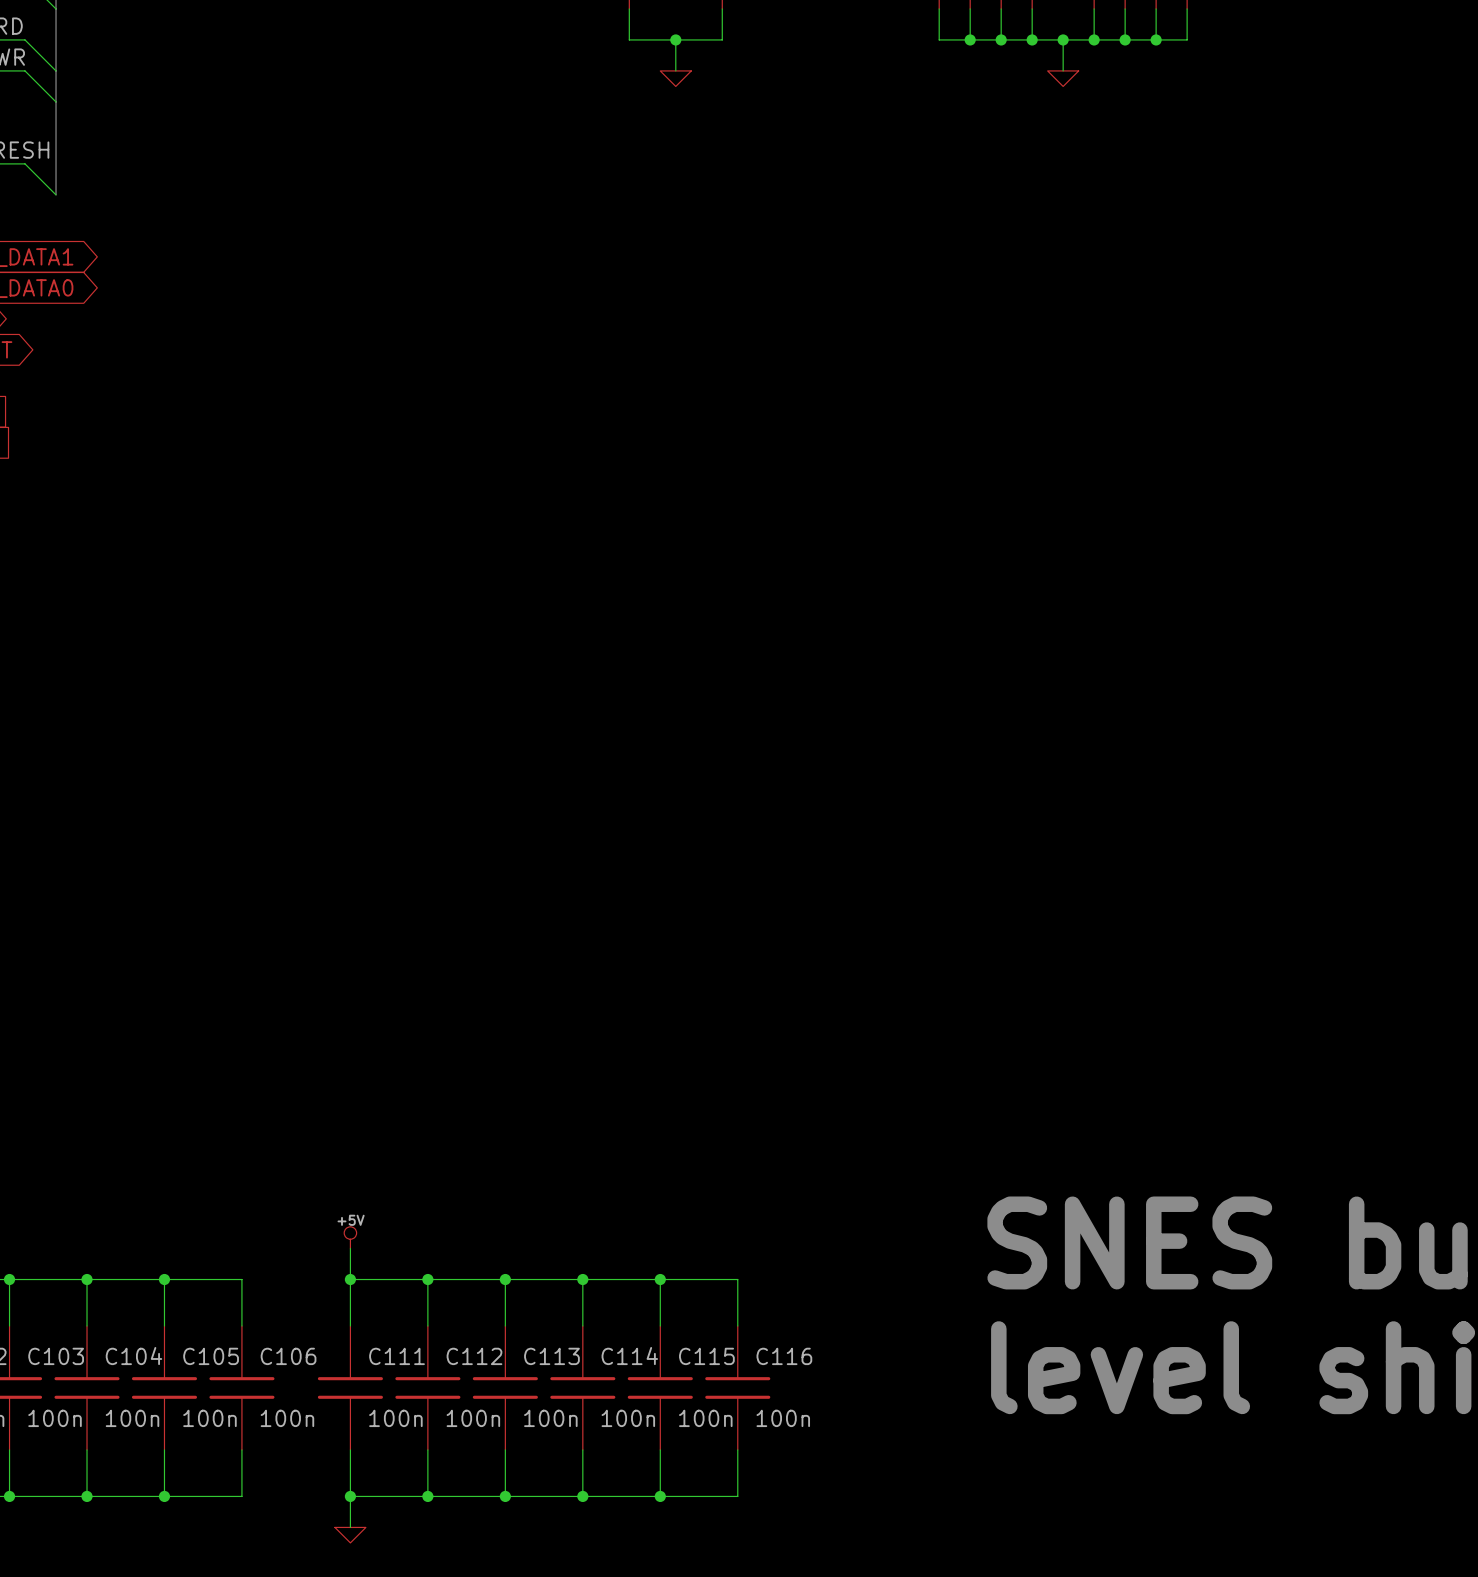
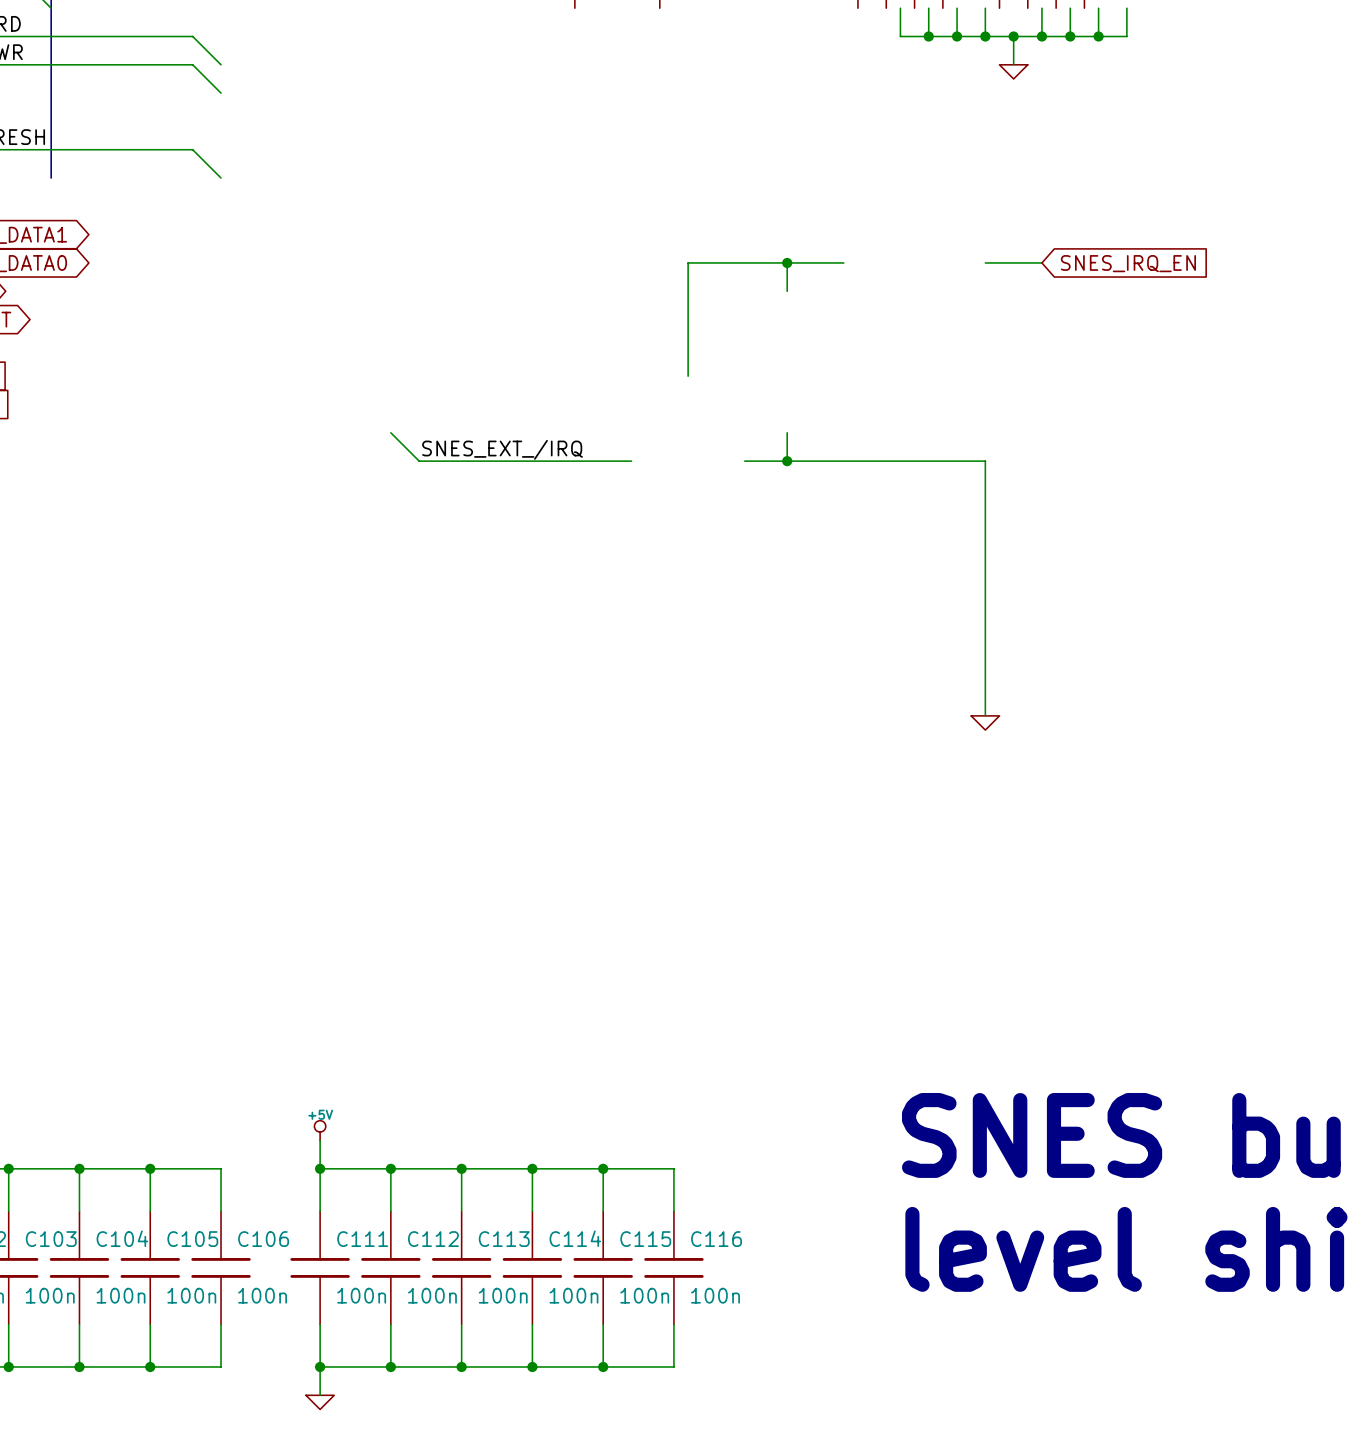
wire: (629, 8) (629, 39) (722, 39) (722, 8) -> none
wire: (939, 8) (939, 39) (985, 39) -> (900, 8) (900, 36)
wire: (970, 8) (970, 39) -> (928, 8) (928, 36)
wire: (1001, 8) (1001, 39) -> (957, 8) (957, 36)
wire: (1032, 8) (1032, 39) -> (985, 8) (985, 36)
wire: (1094, 8) (1094, 39) -> (1041, 8) (1041, 36)
wire: (1125, 8) (1125, 39) -> (1070, 8) (1070, 36)
wire: (1156, 8) (1156, 39) -> (1098, 8) (1098, 36)
wire: (1187, 8) (1187, 39) -> (1126, 8) (1126, 36) (1084, 36)
wire: (25, 39) (56, 70) -> (22, 36) (192, 36) (221, 64)
wire: (675, 39) (675, 70) -> none
junction: (675, 39) -> none
junction: (970, 39) -> none
junction: (1001, 39) -> none
junction: none -> (928, 36)
junction: (1032, 39) -> none
junction: none -> (957, 36)
wire: (1063, 39) (1063, 70) -> (1013, 36) (1013, 64)
junction: (1063, 39) -> none
junction: none -> (985, 36)
junction: (1094, 39) -> none
junction: none -> (1013, 36)
junction: (1125, 39) -> none
junction: none -> (1041, 36)
junction: (1156, 39) -> none
junction: none -> (1070, 36)
junction: none -> (1098, 36)
wire: (25, 70) (56, 101) -> (22, 64) (192, 64) (221, 93)
power symbol: (675, 78) -> none
power symbol position: (1063, 78) -> (1013, 71)
wire: (25, 163) (56, 194) -> (22, 149) (192, 149) (221, 178)
wire: none -> (787, 262) (787, 291)
junction: none -> (787, 262)
wire: none -> (843, 262) (688, 262) (688, 376)
wire: none -> (985, 262) (1041, 262)
global label: none -> SNES_IRQ_EN (1128, 263)
wire: none -> (390, 432) (419, 461) (631, 461)
wire: none -> (787, 432) (787, 461)
label: none -> SNES_EXT_/IRQ (502, 449)
wire: none -> (744, 461) (985, 461) (985, 715)
junction: none -> (787, 461)
power symbol: none -> (985, 722)

